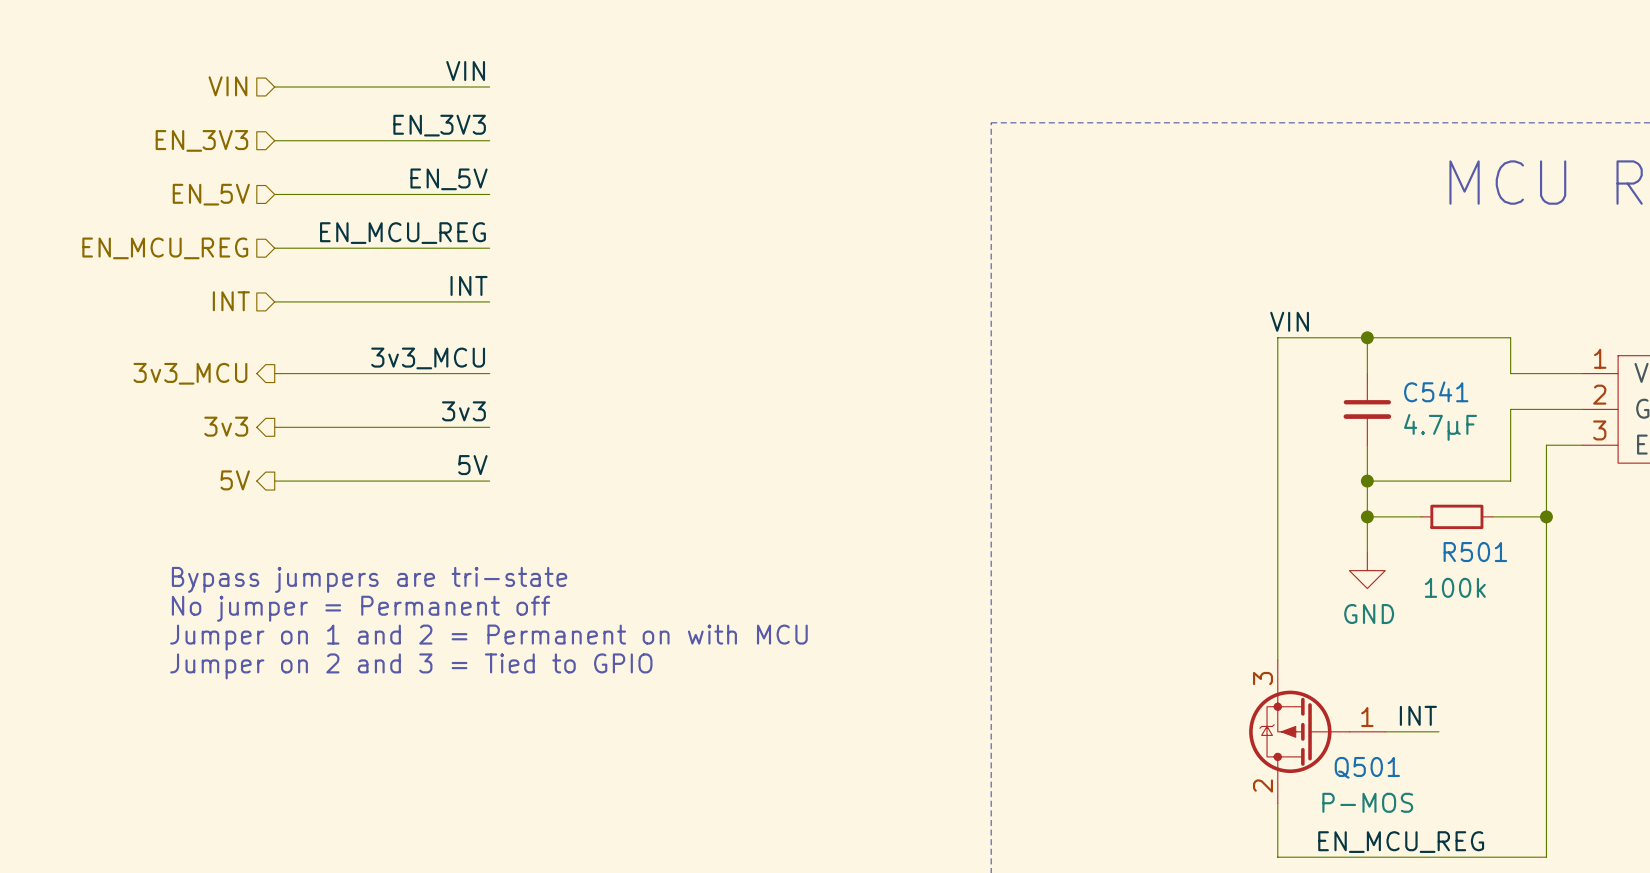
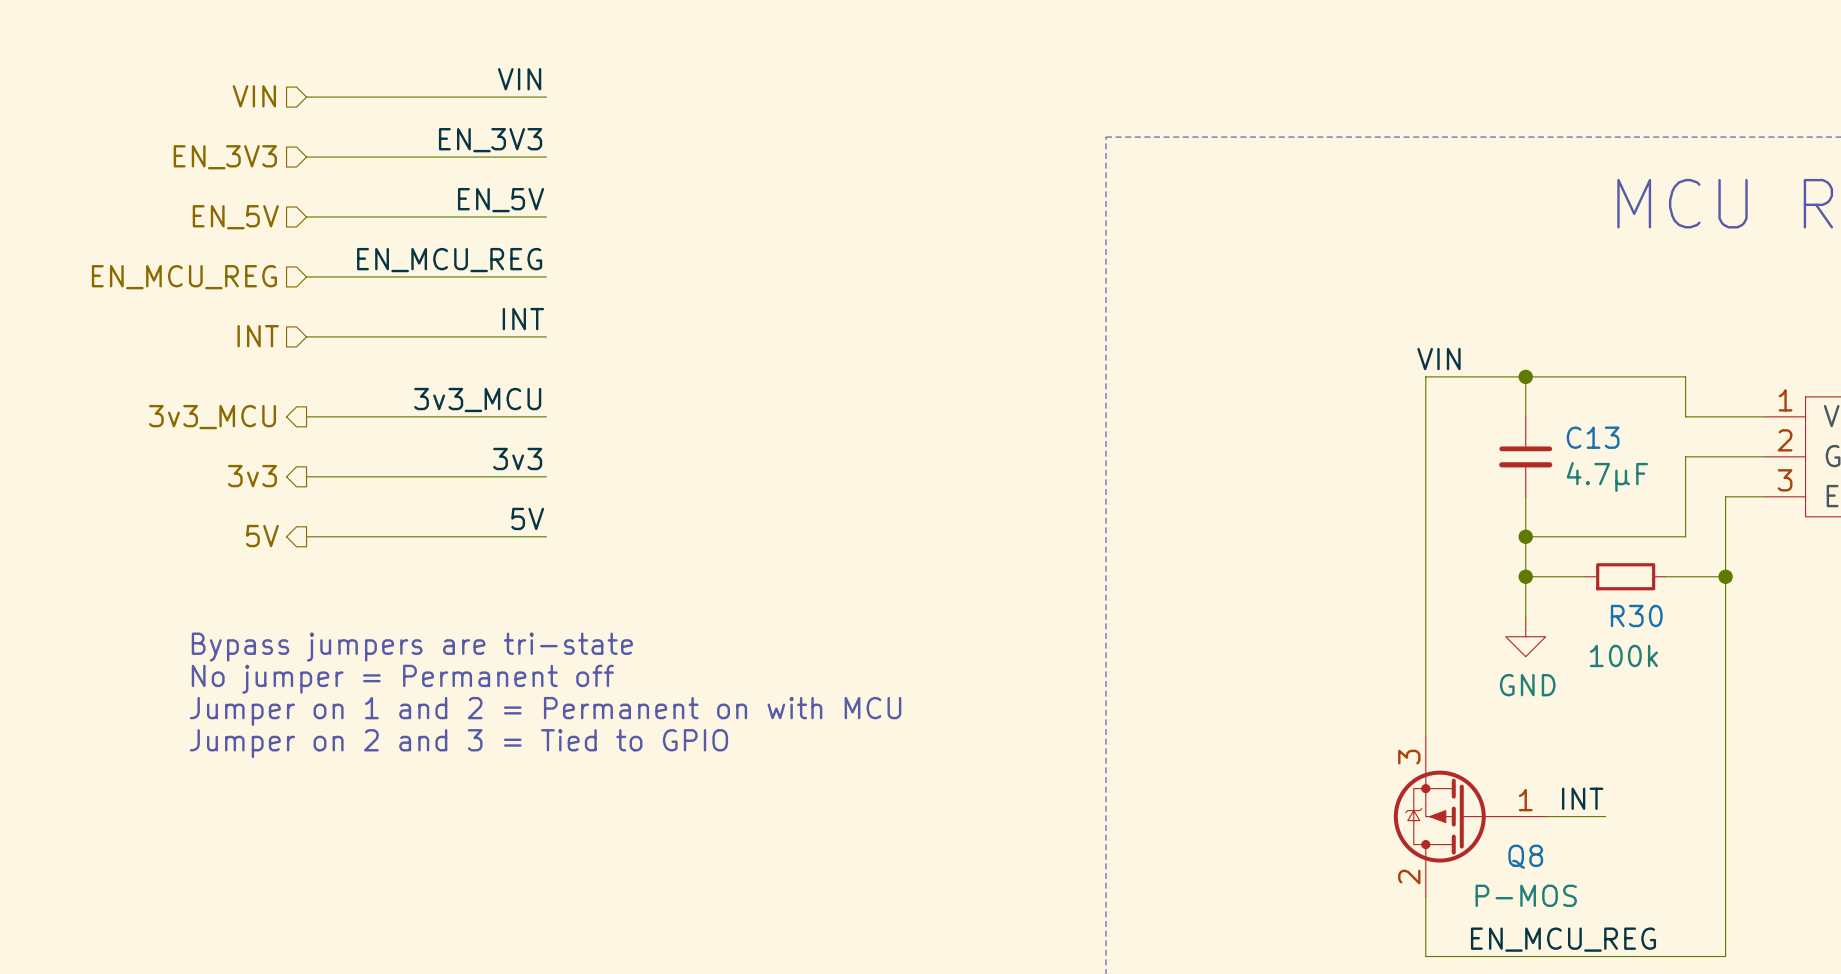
C541 name: C541 (1436, 391) -> C13 (1593, 437)
R501 name: R501 (1475, 552) -> R30 (1636, 615)
Q501 name: Q501 (1367, 767) -> Q8 (1525, 856)

